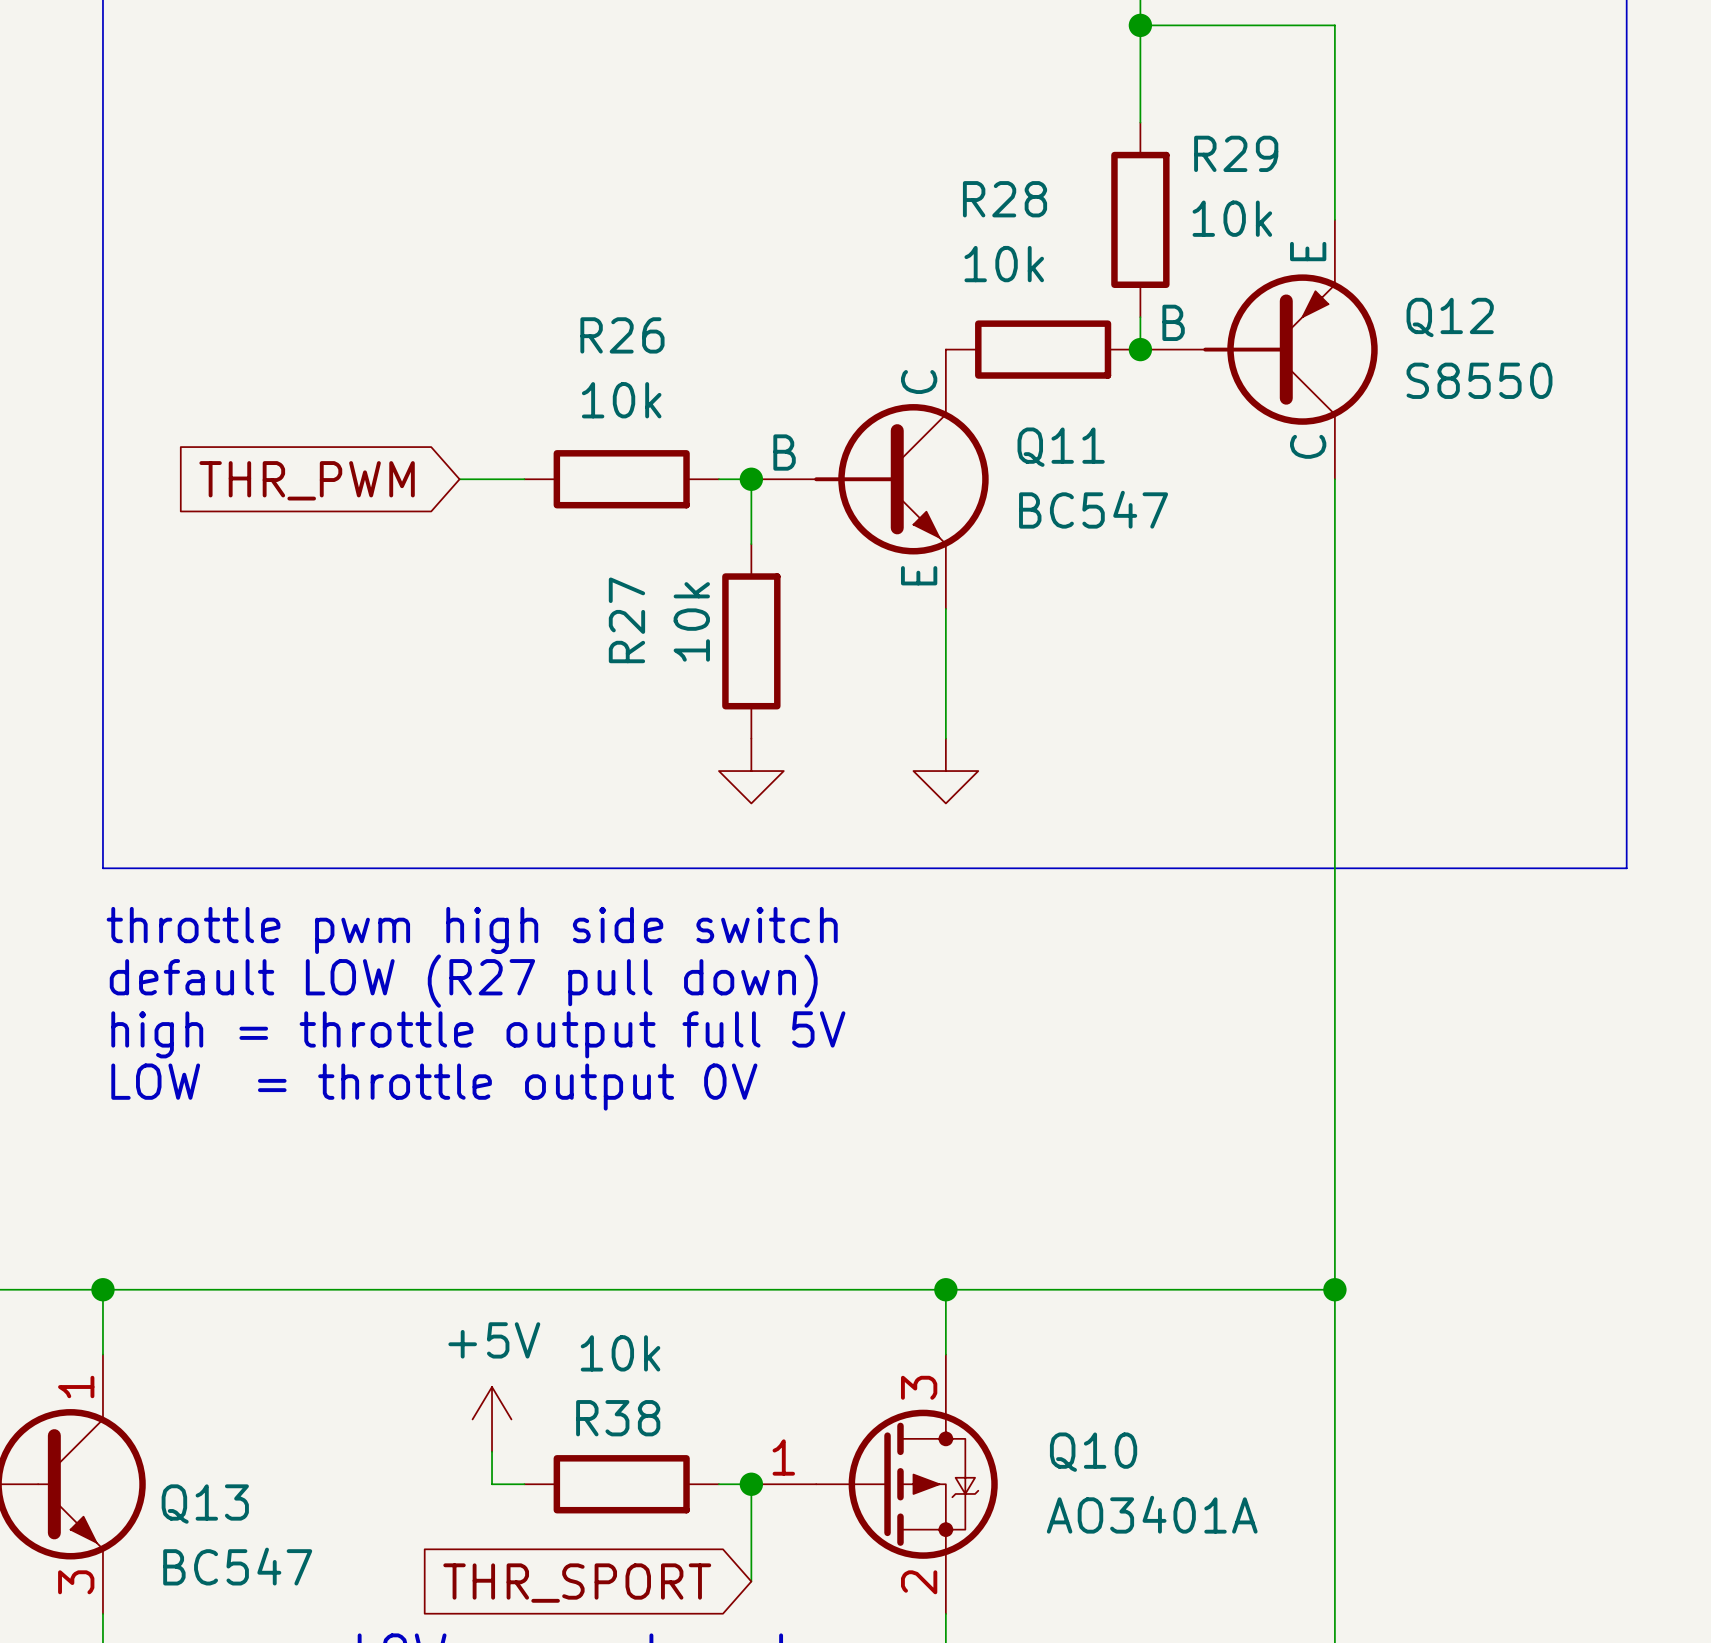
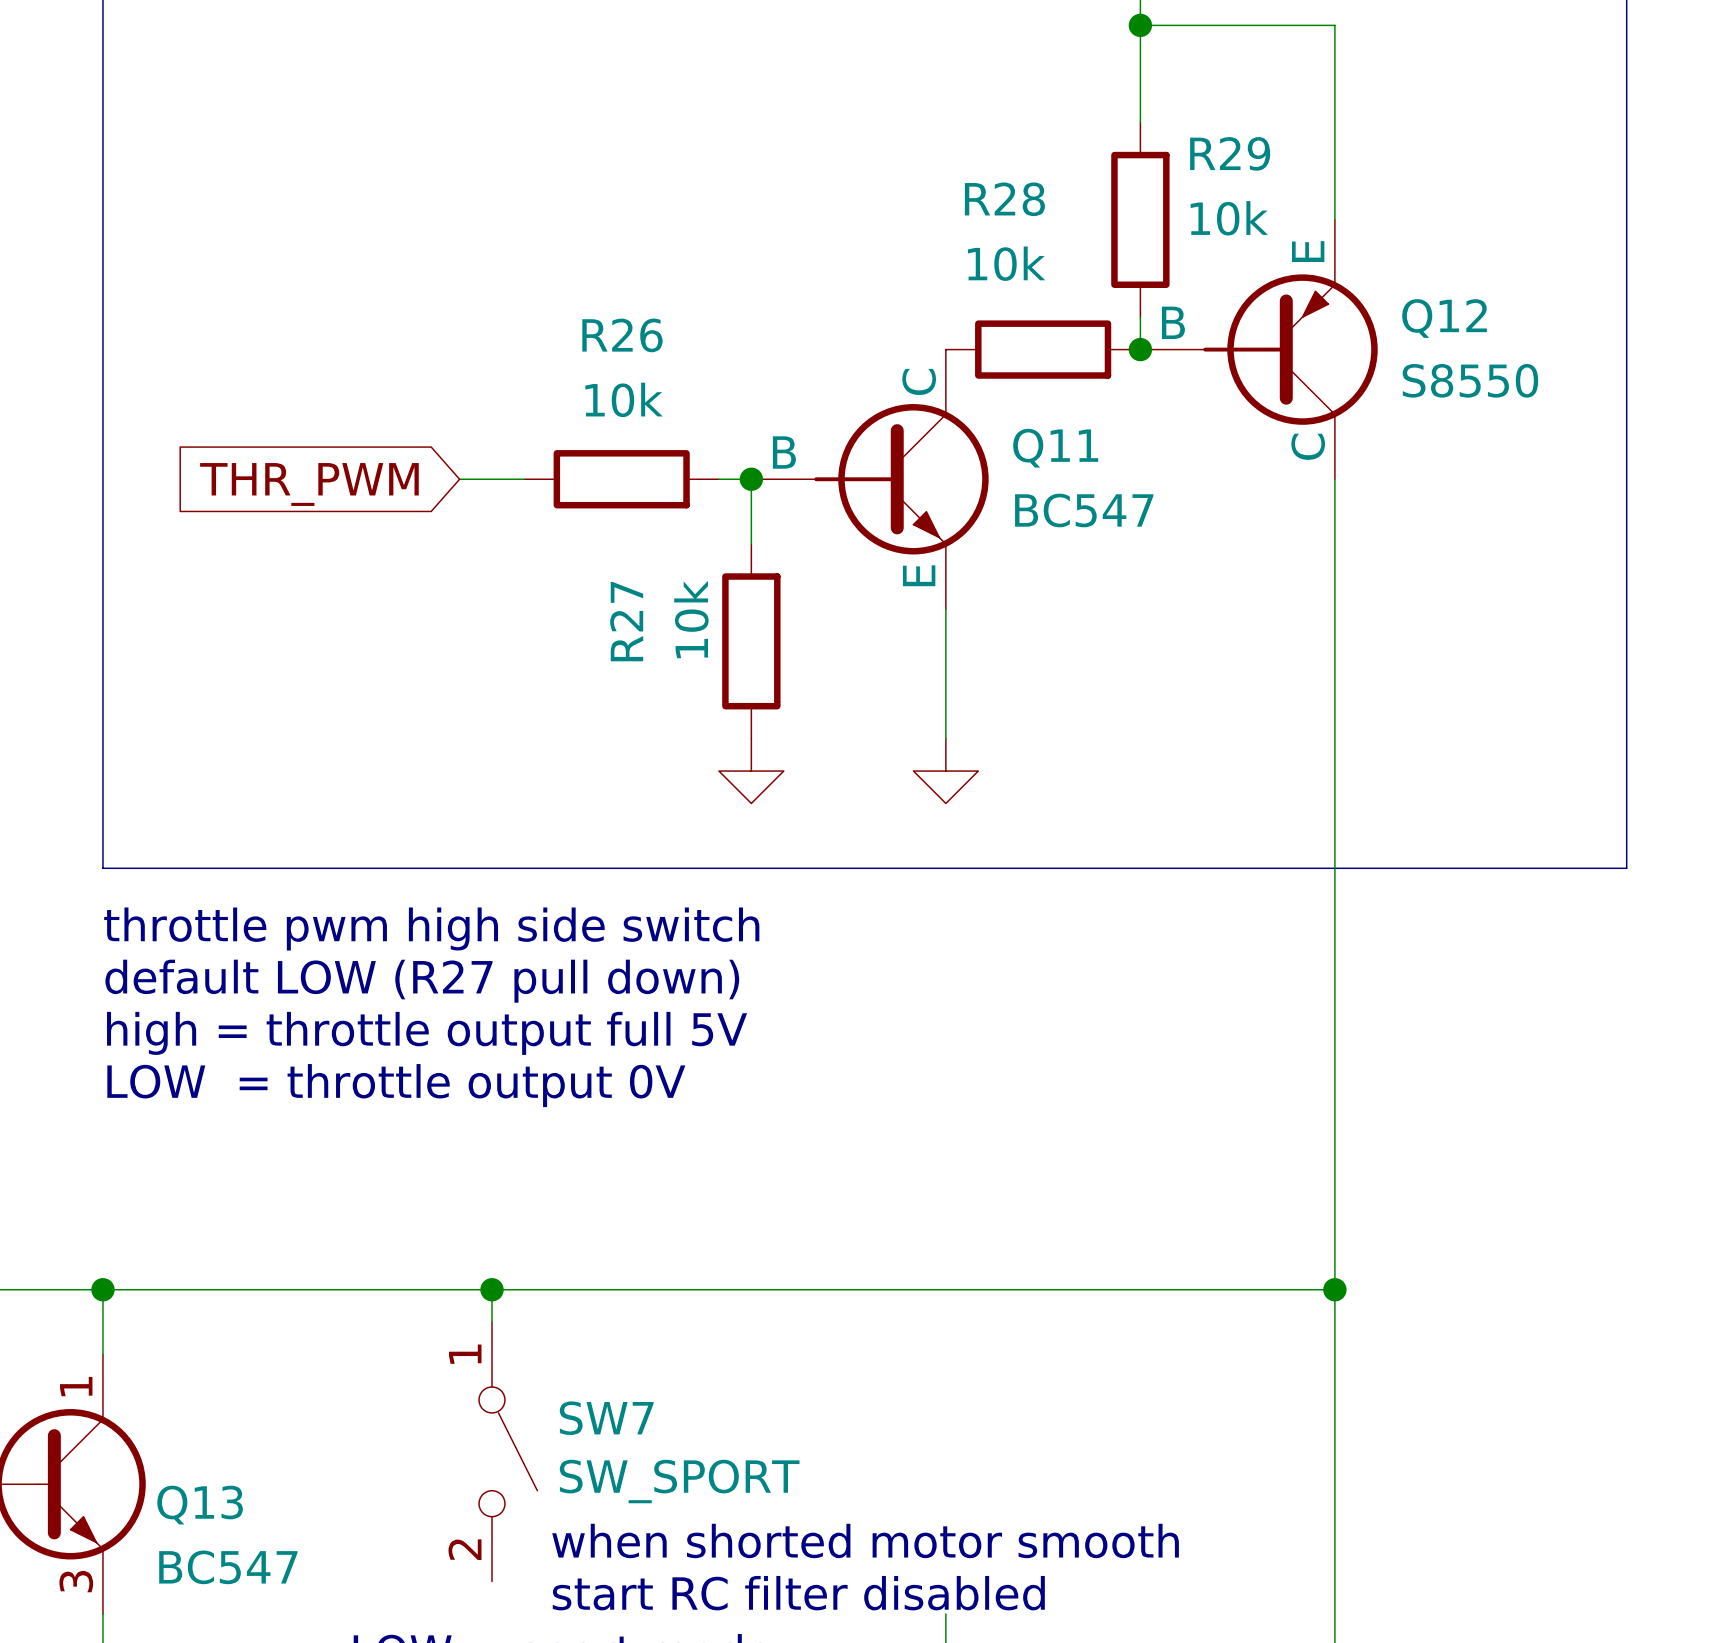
wire: none -> (492, 1289) (492, 1322)
junction: none -> (492, 1289)
wire: (945, 1289) (945, 1354) -> none
junction: (945, 1289) -> none
power symbol: +5V (492, 1419) -> none
wire: (492, 1451) (492, 1484) (524, 1484) -> none
SW7: none -> SW_SPORT (508, 1451)
R38: 10k (621, 1484) -> none
wire: (718, 1484) (751, 1484) (751, 1581) -> none
junction: (751, 1484) -> none
Q10: AO3401A (874, 1484) -> none
text: none -> when shorted motor smooth (865, 1540)
global label: THR_SPORT (577, 1583) -> none
text: none -> start RC filter disabled (798, 1593)

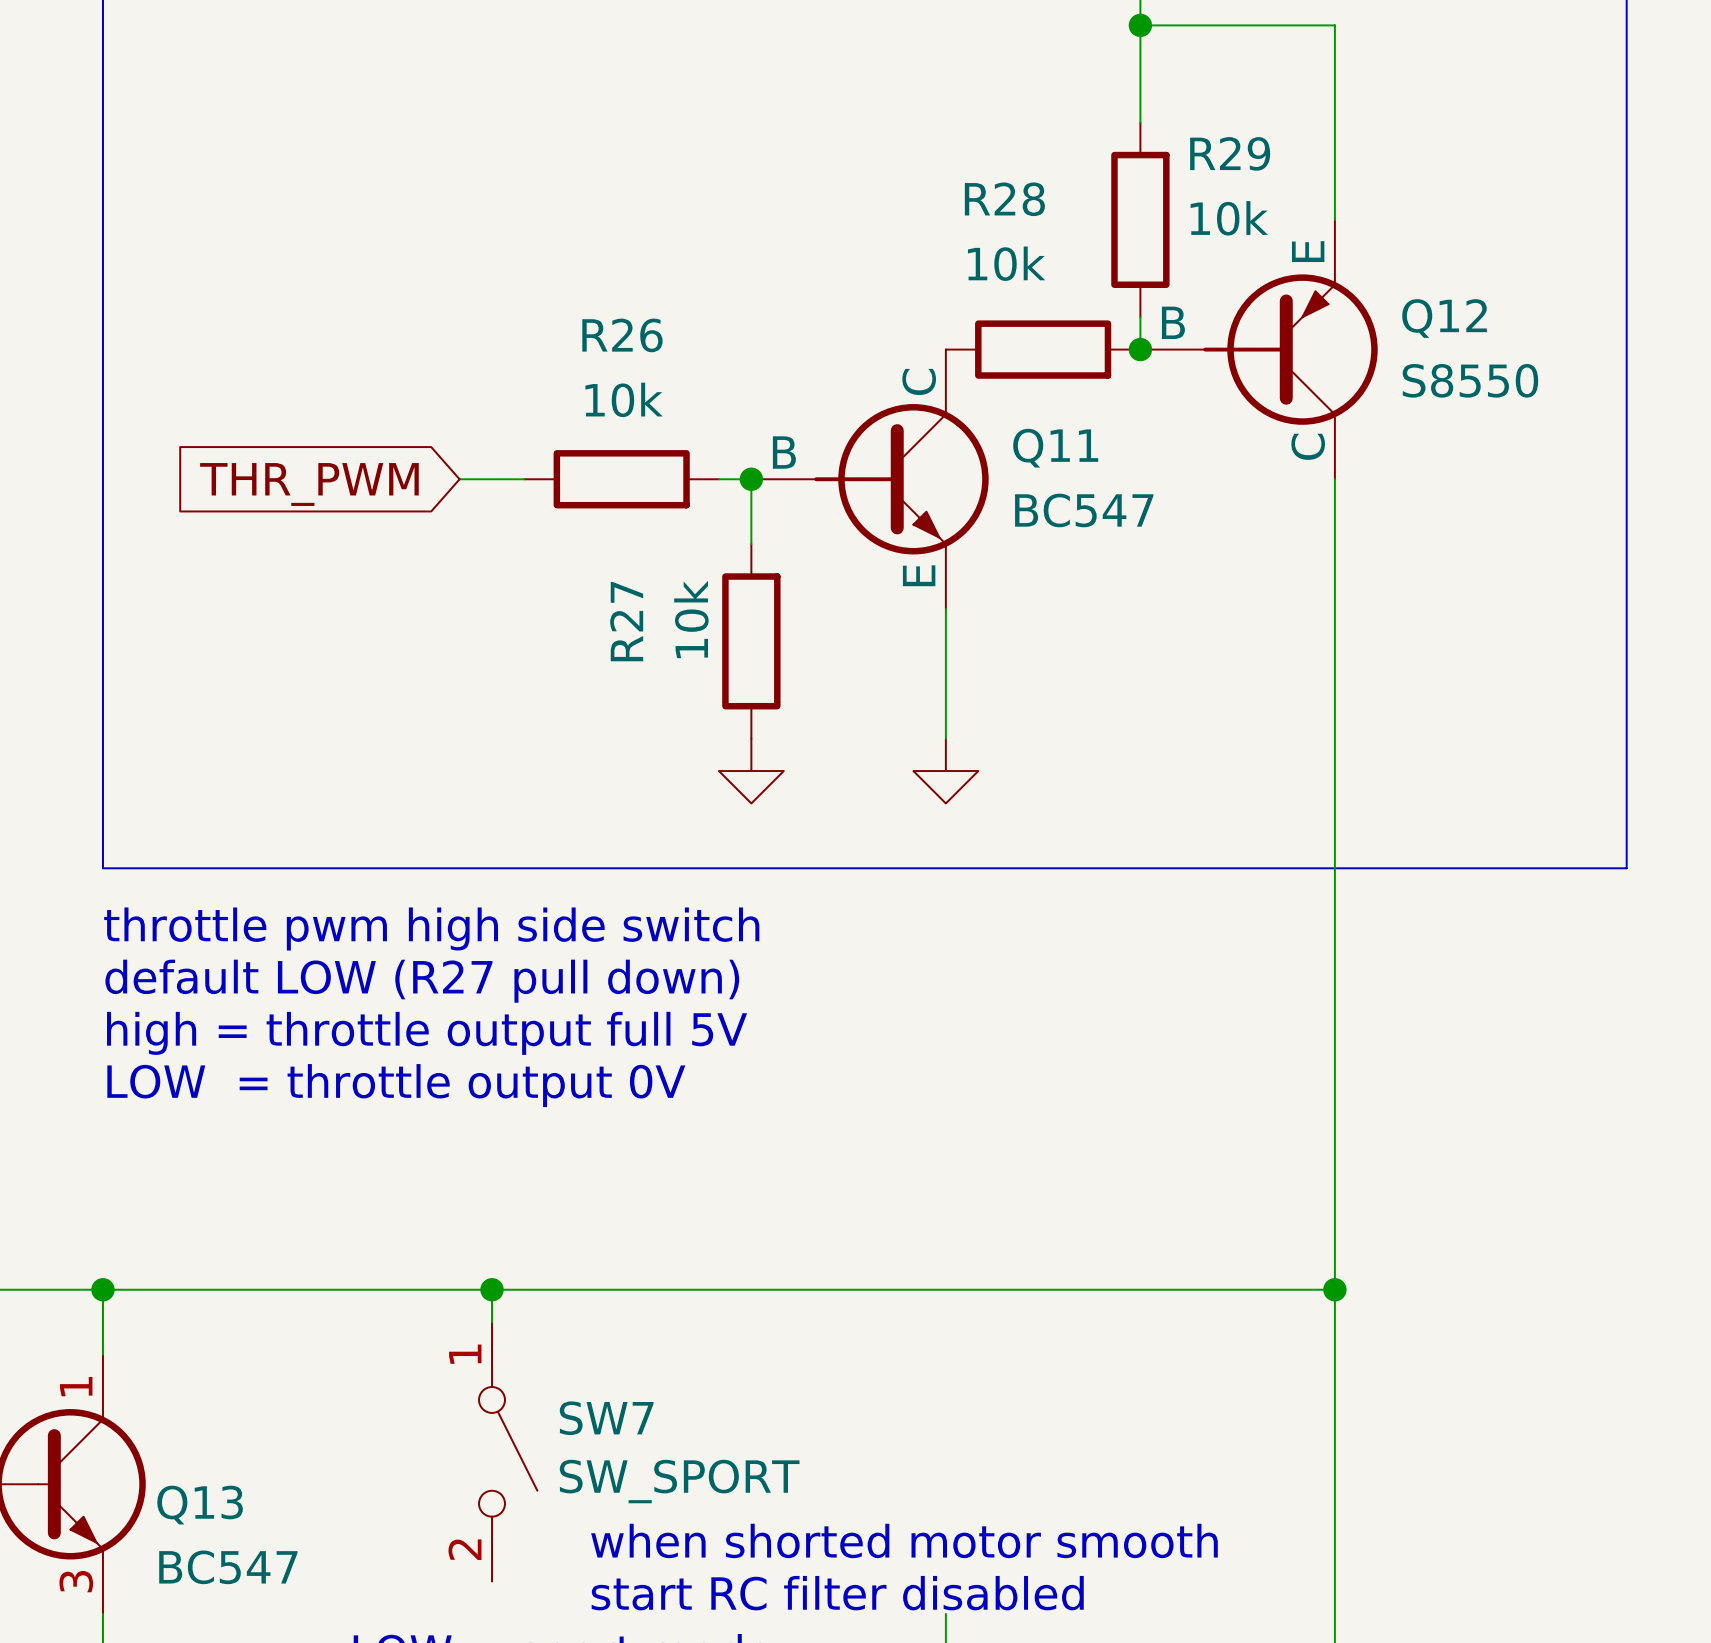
text position: when shorted motor smooth (865, 1540) -> when shorted motor smooth (904, 1540)
text position: start RC filter disabled (798, 1593) -> start RC filter disabled (837, 1593)

